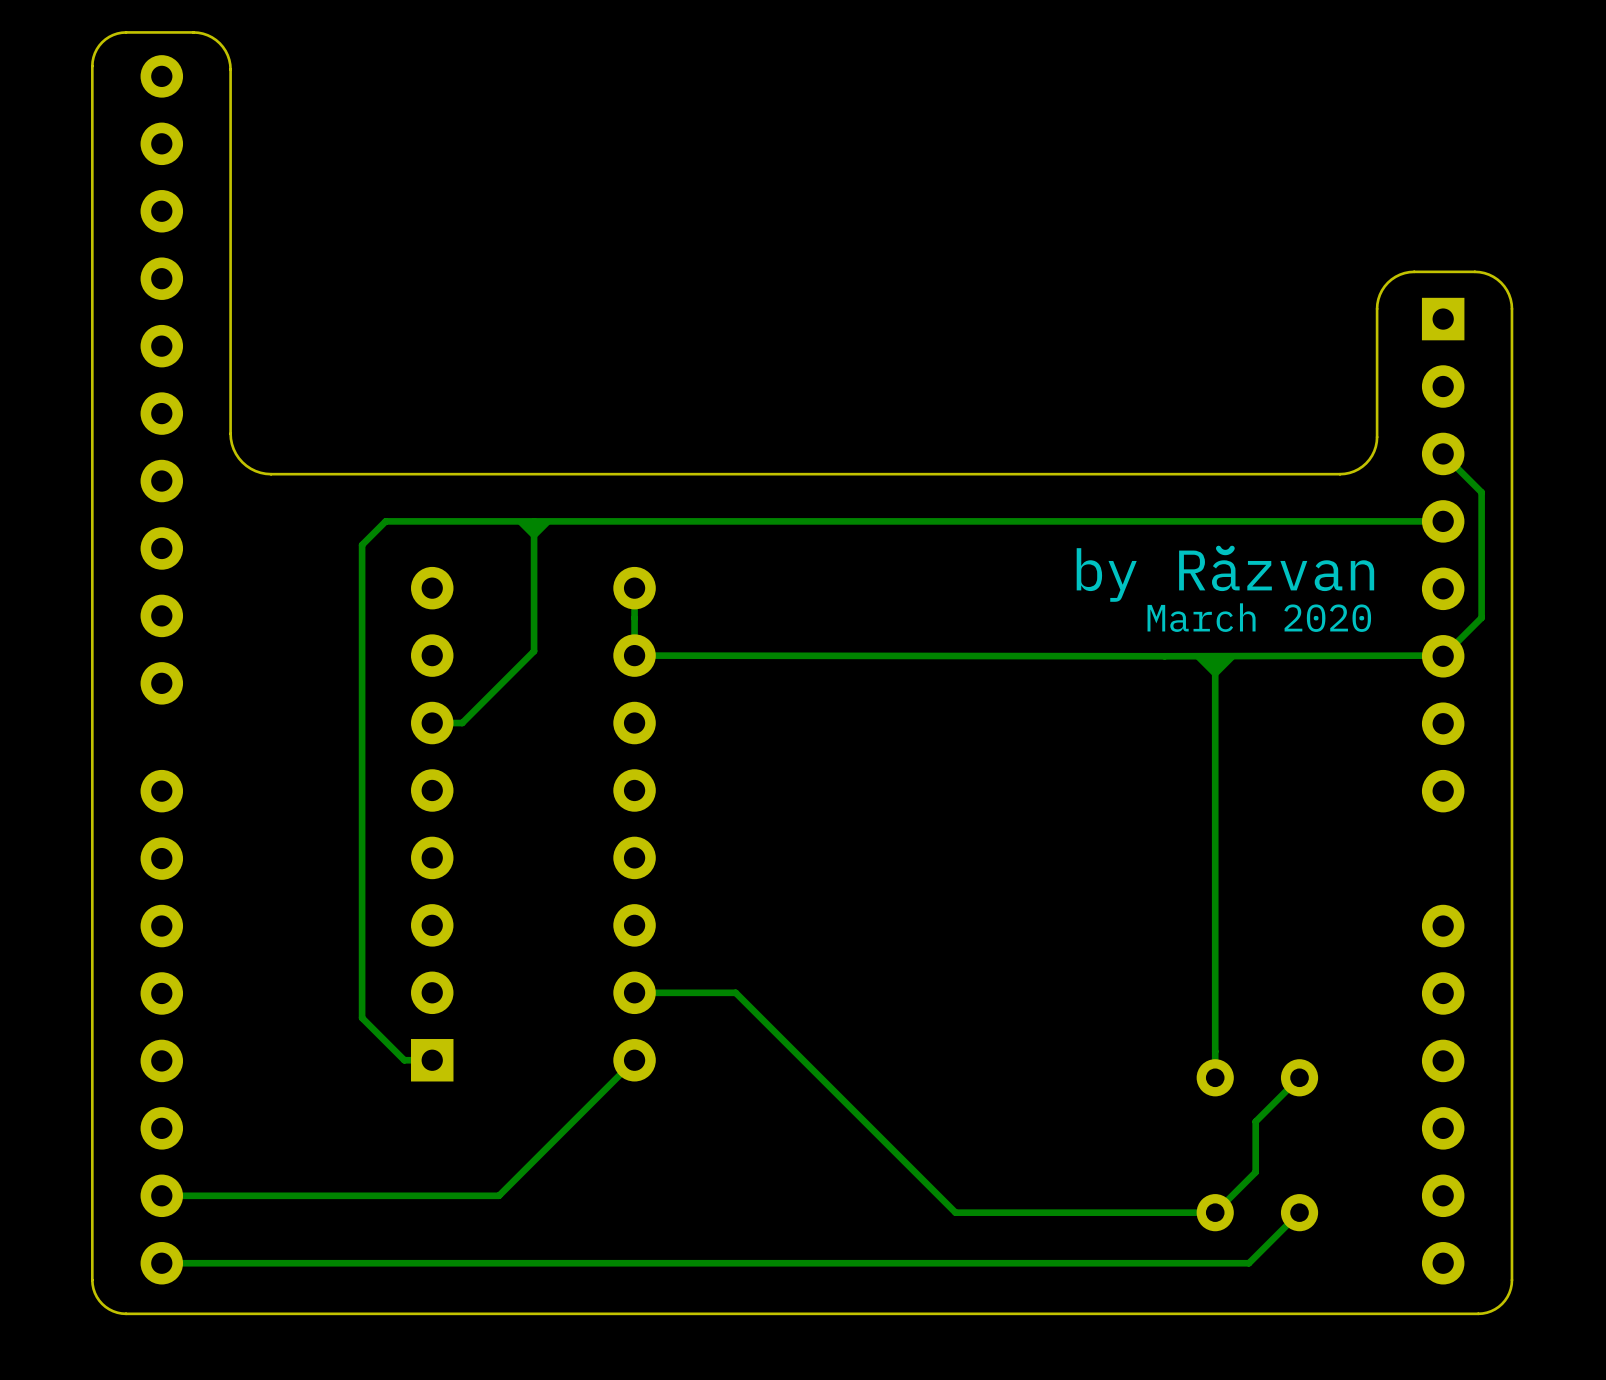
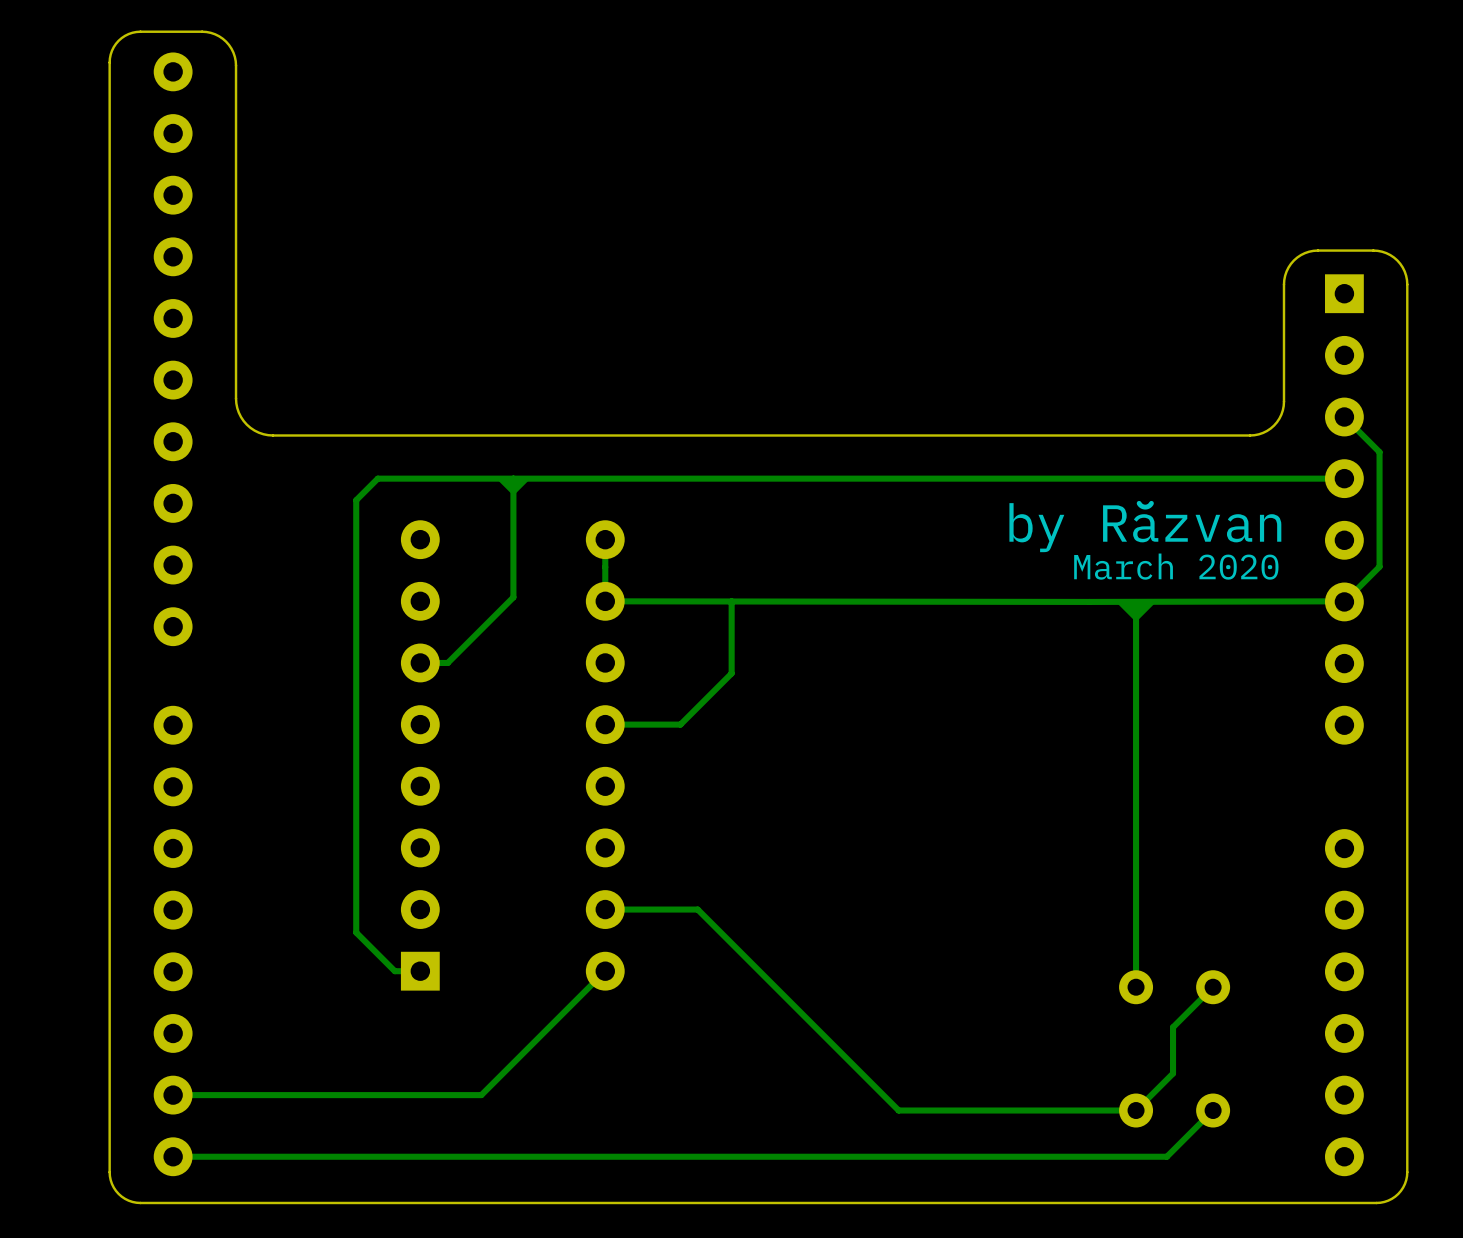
track: none -> (731, 601) (731, 673) (680, 724) (605, 724)

